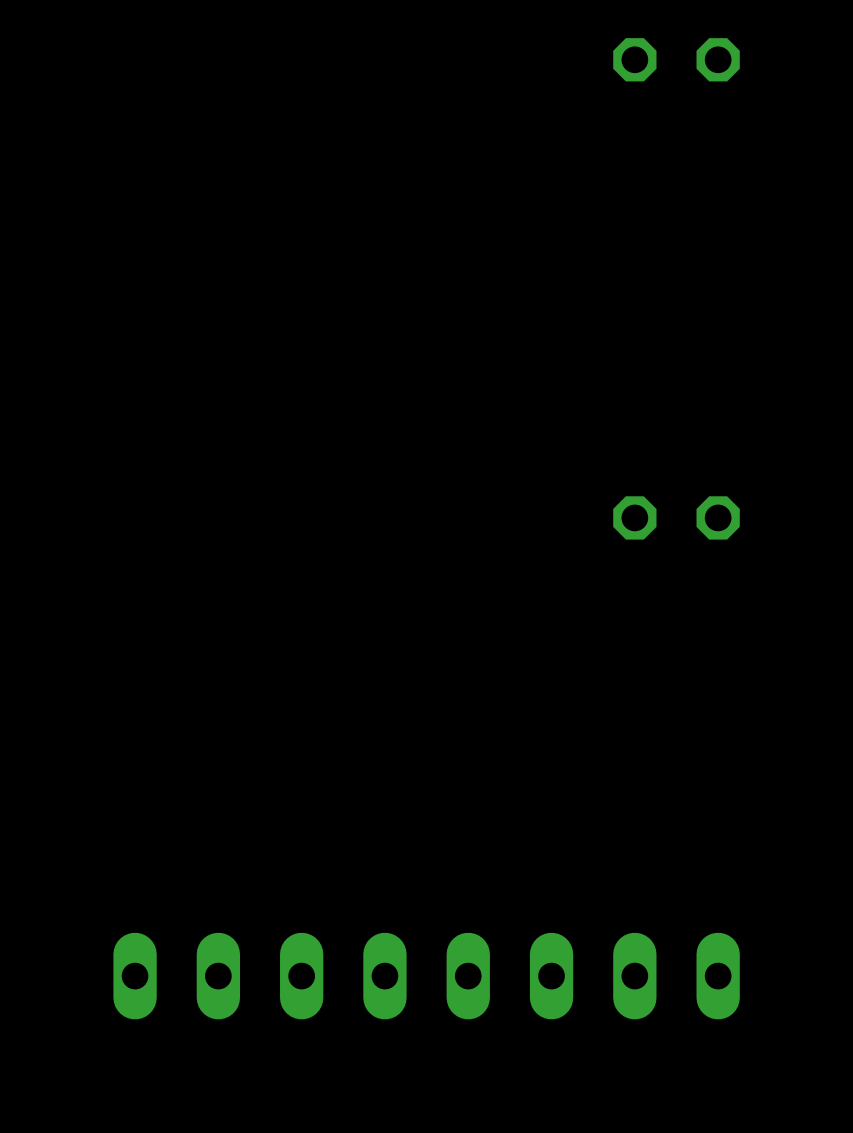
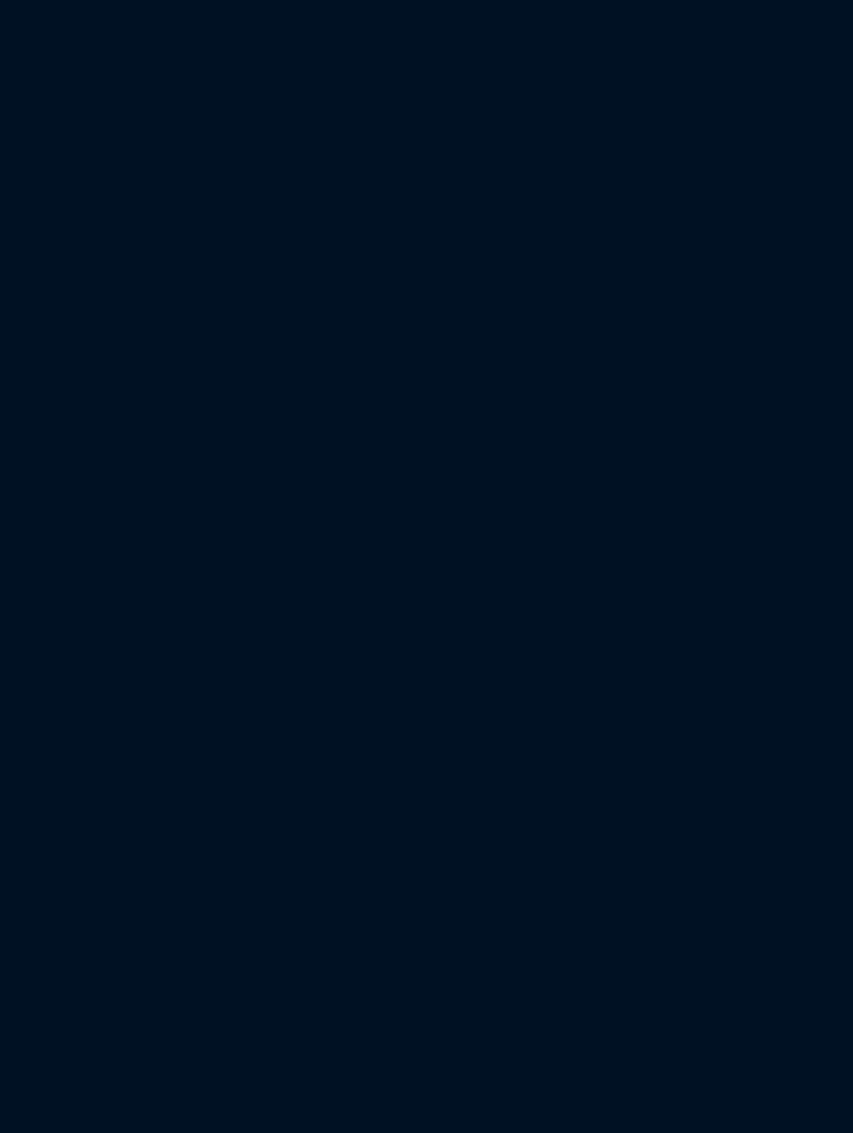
part: (676, 59) -> none
part: (676, 517) -> none
part: (426, 976) -> none

